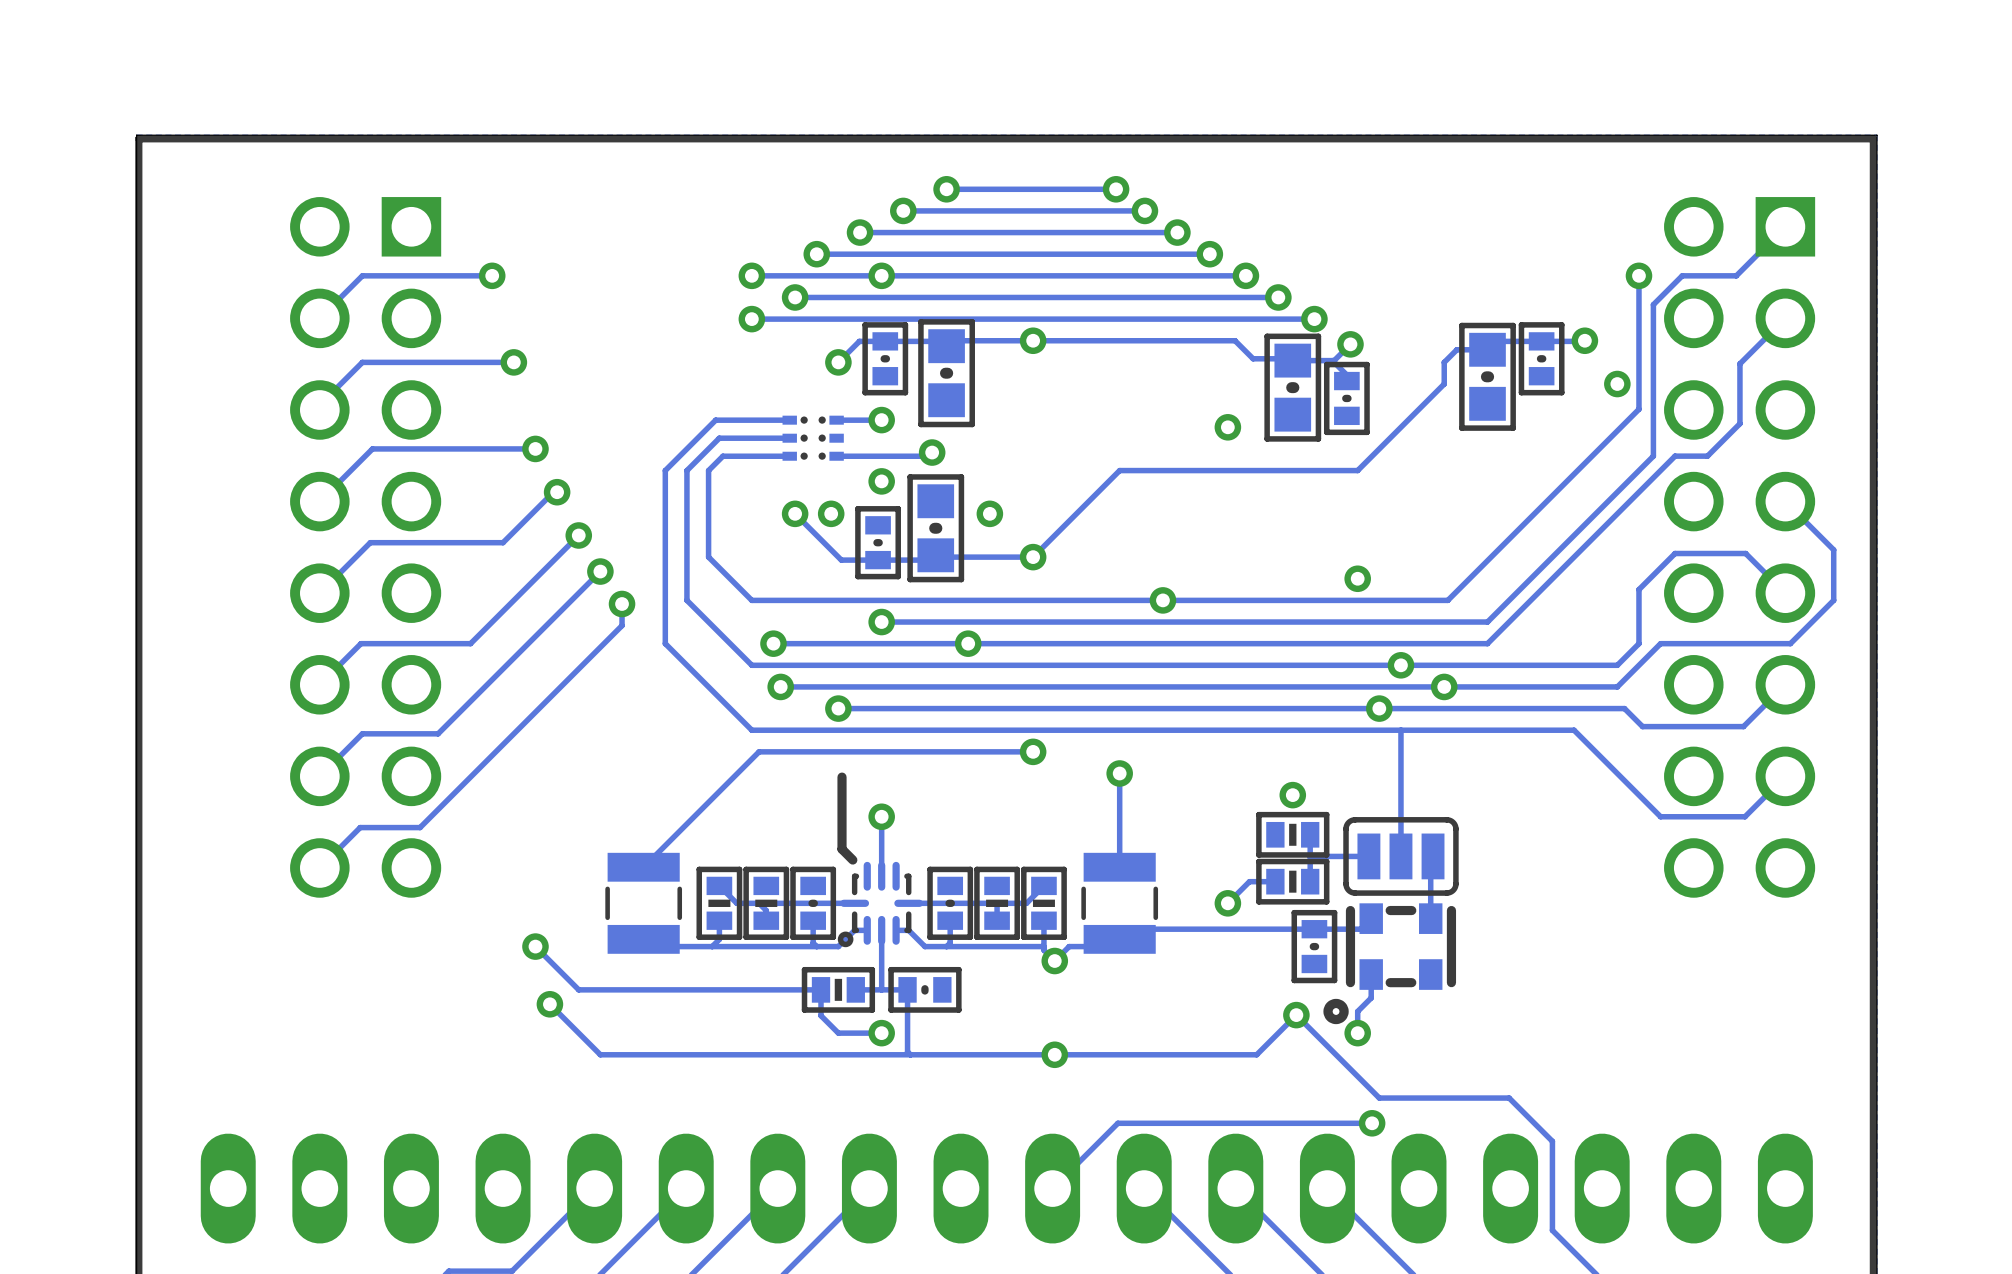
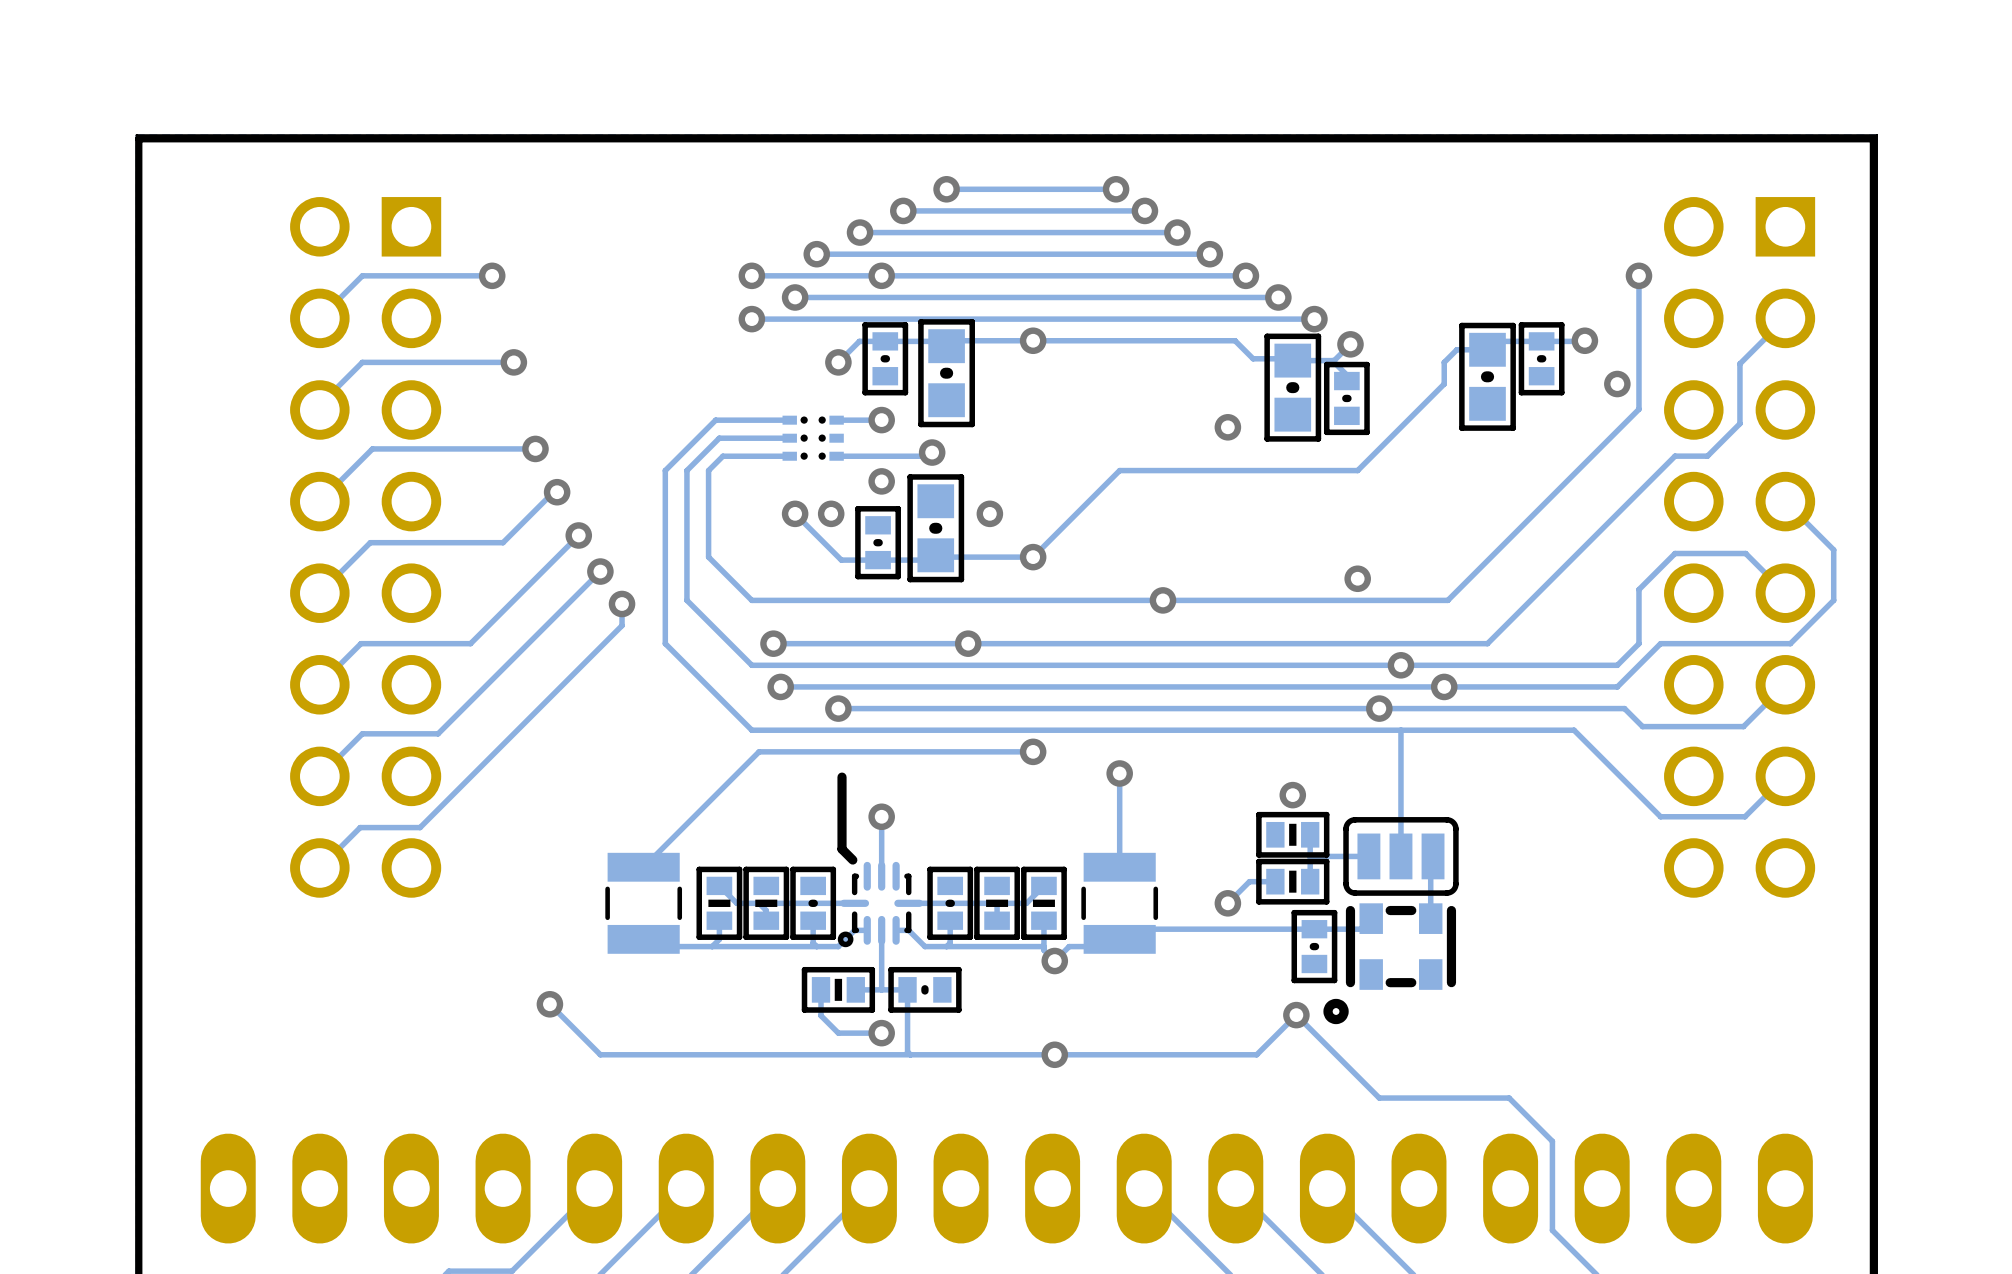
track: (1785, 226) (1736, 275) (1682, 275) (1653, 304) (1653, 456) (1487, 622) (881, 622) -> none
via: (881, 622) -> none
track: (535, 946) (578, 989) (821, 989) -> none
via: (535, 946) -> none
track: (1371, 974) (1371, 997) (1357, 1011) (1357, 1033) -> none
via: (1357, 1033) -> none
track: (1372, 1123) (1117, 1123) (1052, 1188) -> none
via: (1372, 1123) -> none

